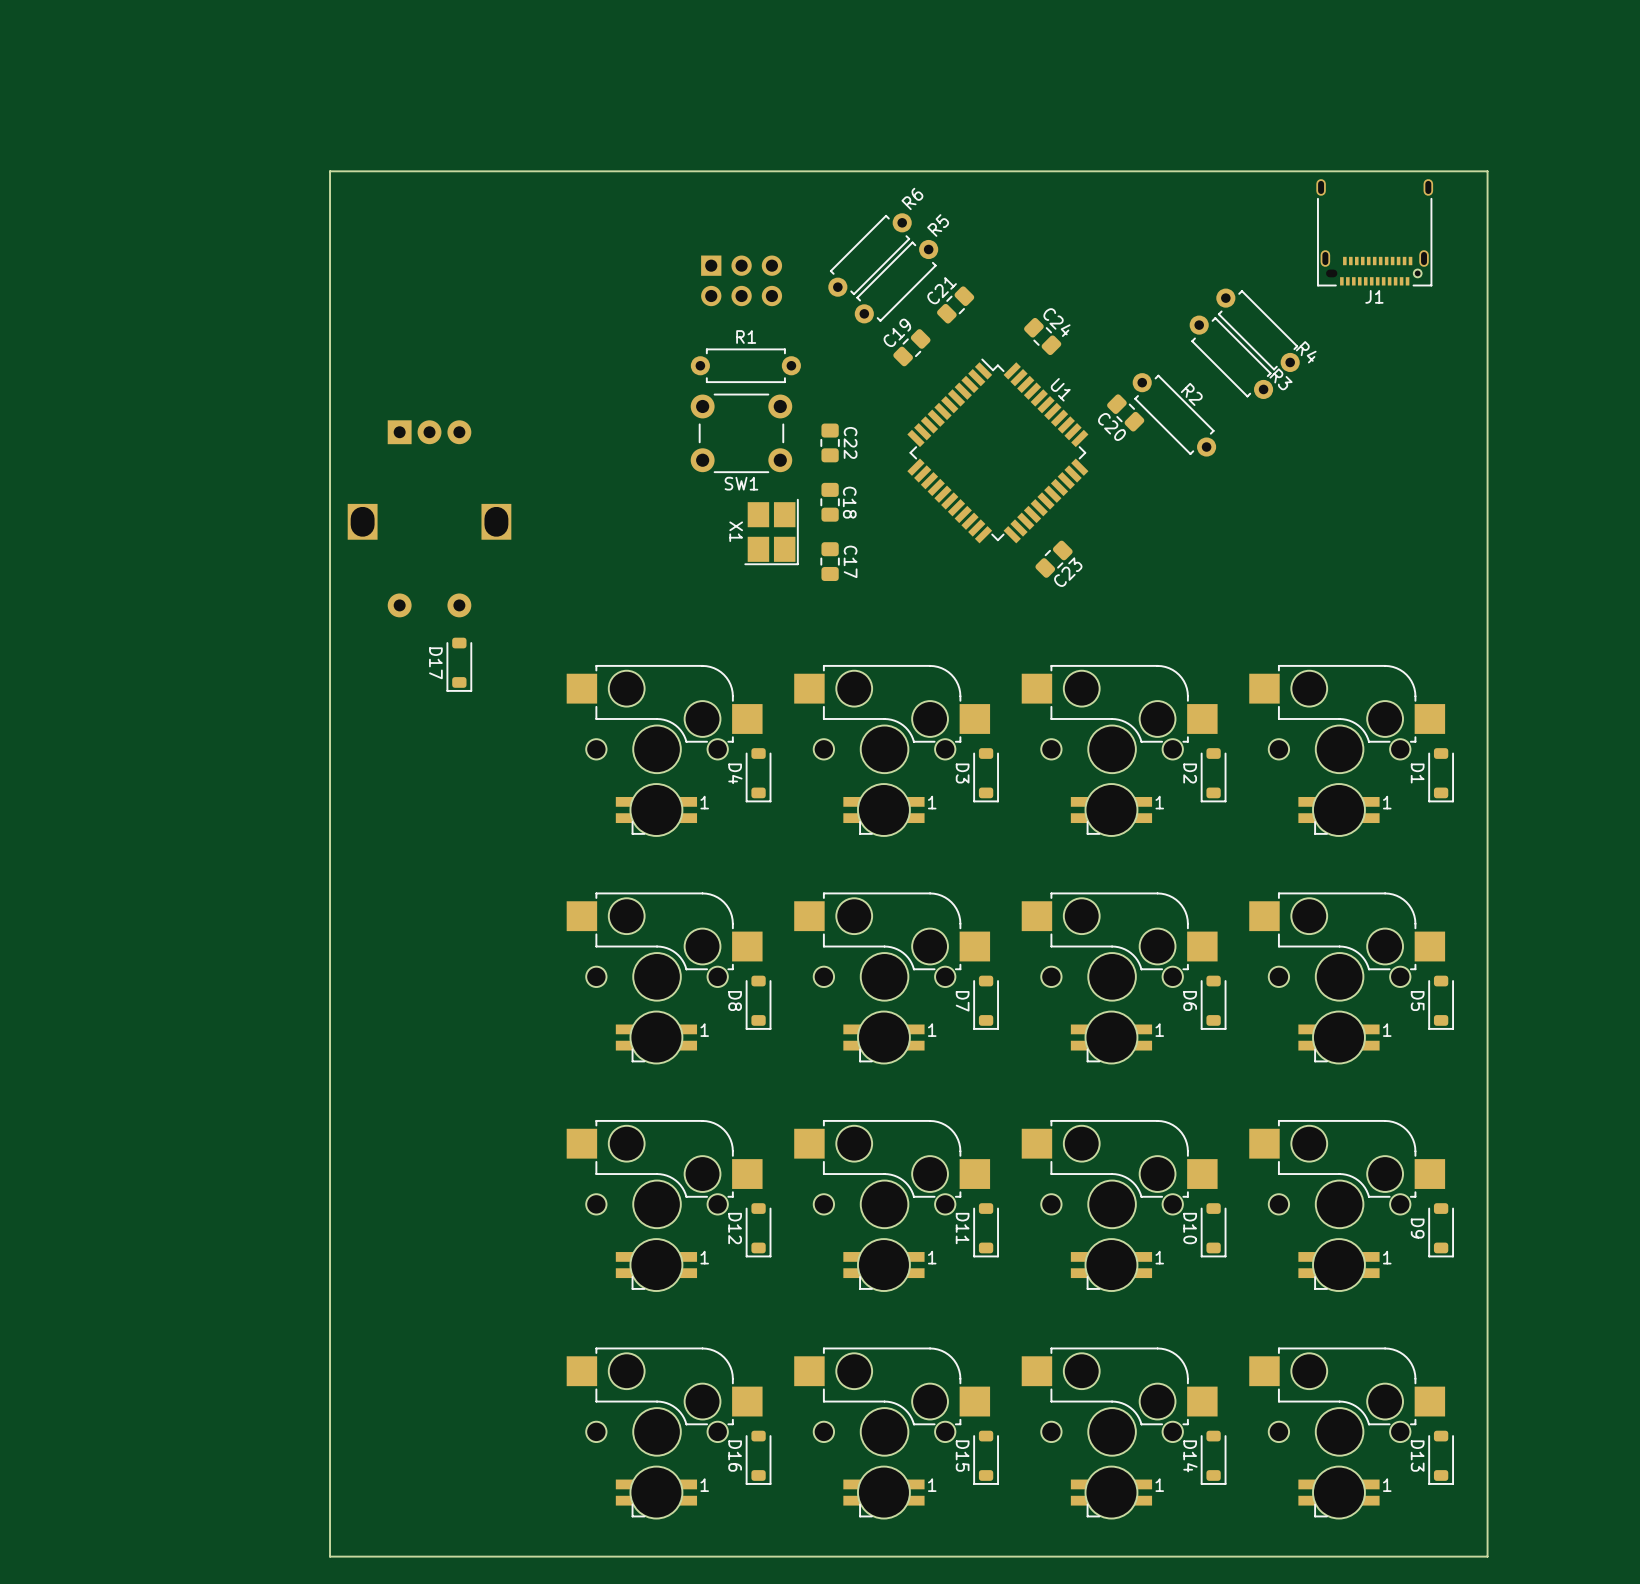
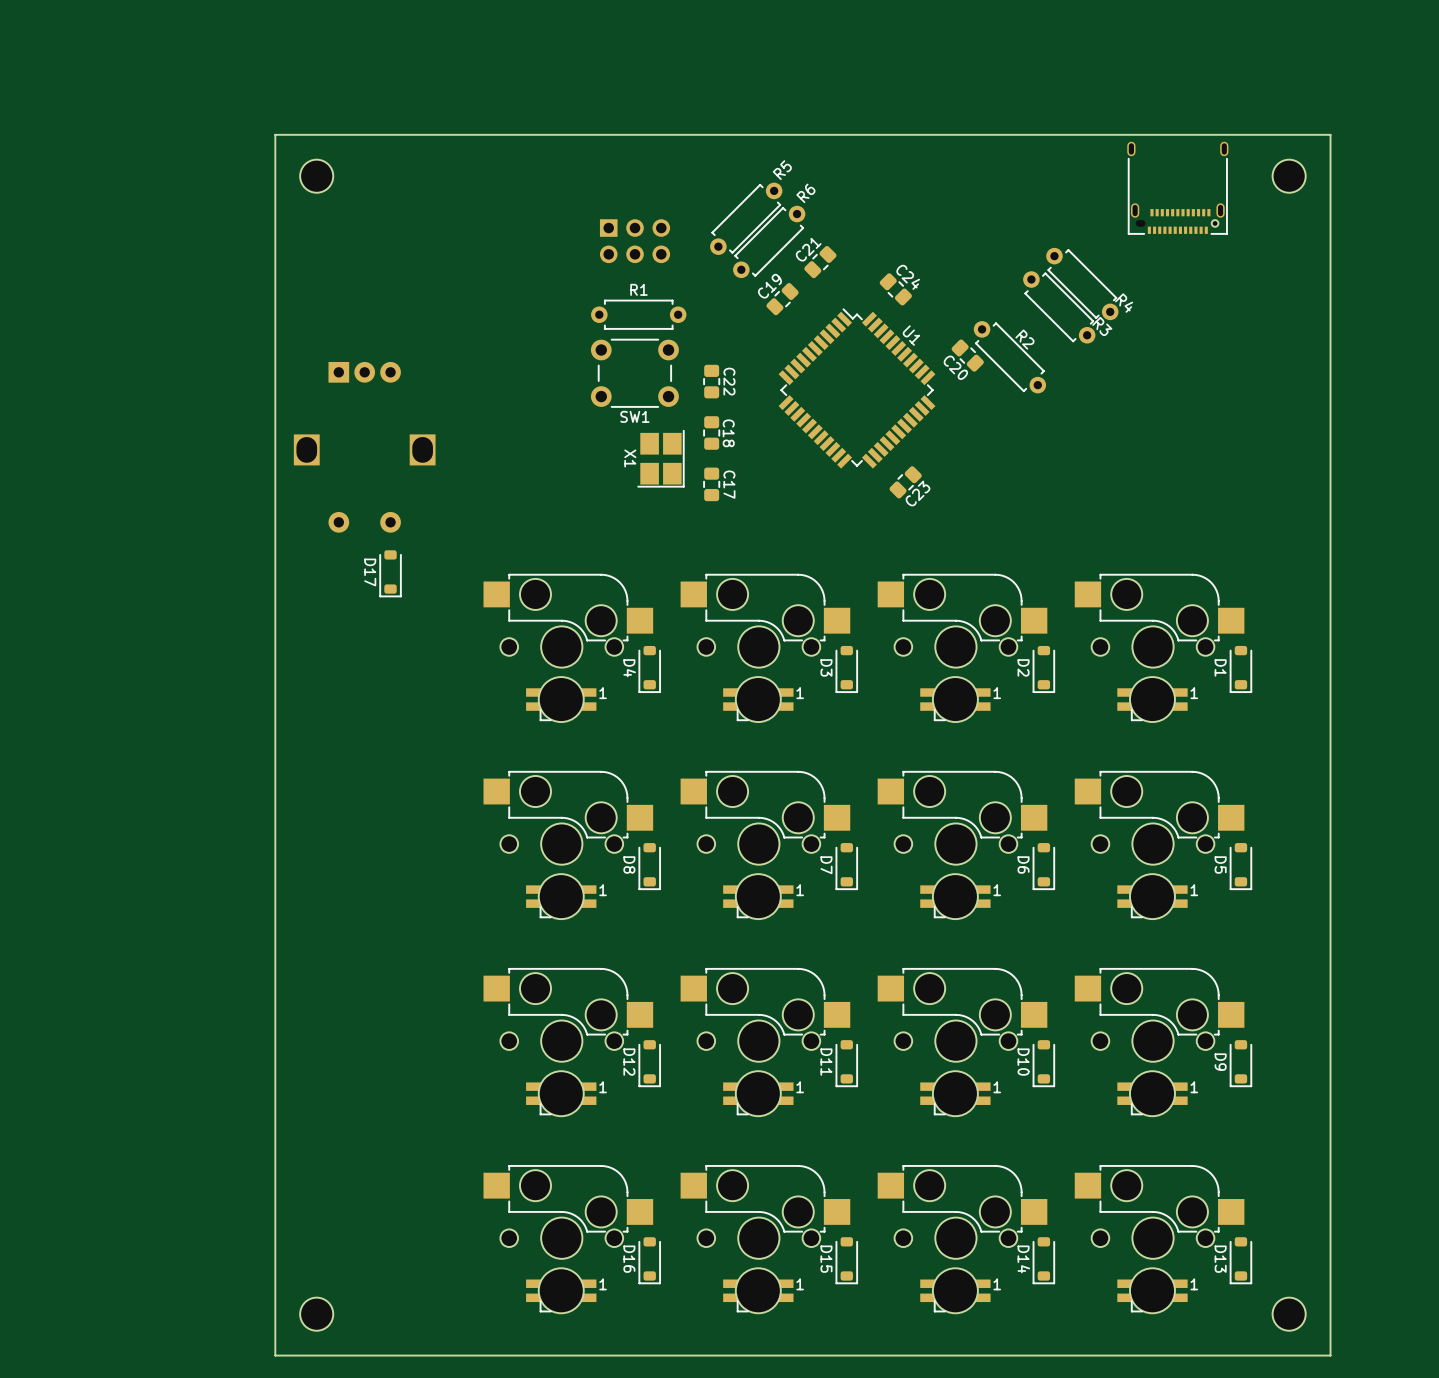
board edge: (1487, 171) (330, 171) (330, 1556) (1487, 1556) (1487, 171) -> (1330, 134) (1330, 1355) (275, 1355) (275, 134) (1330, 134)
R6 name: R6 (912, 198) -> R5 (782, 170)
part: none -> (316, 176)
part: none -> (1289, 176)
part: none -> (1177, 188)
R5 name: R5 (938, 225) -> R6 (805, 193)
J1: (1374, 232) -> none
part: none -> (316, 1314)
part: none -> (1289, 1314)

